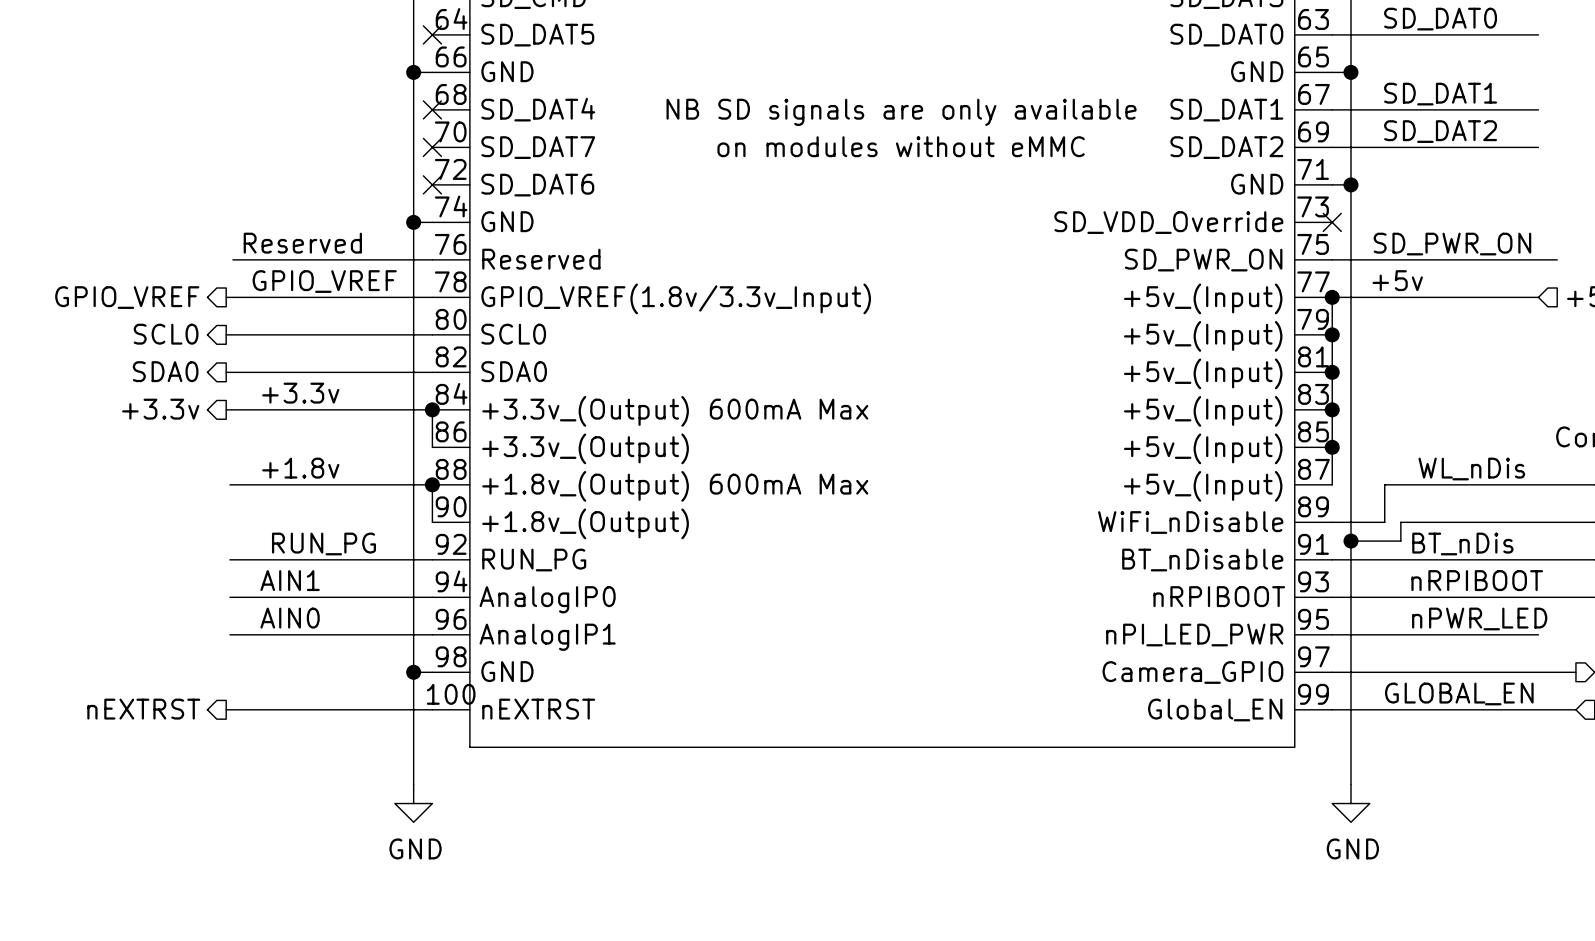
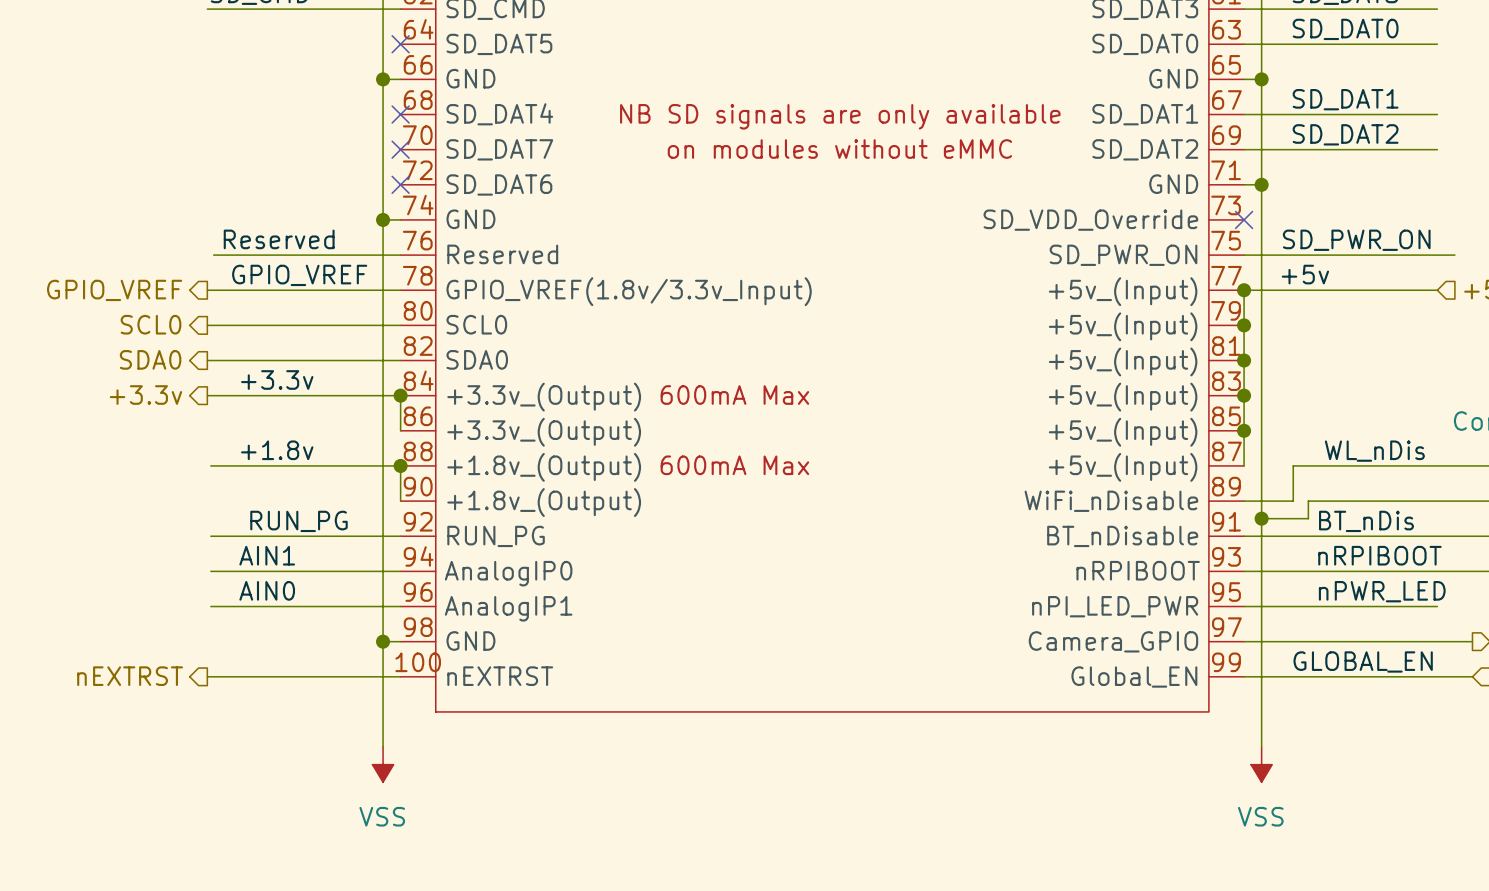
power symbol: GND (413, 803) -> VSS (383, 764)
power symbol: GND (1350, 803) -> VSS (1261, 764)

